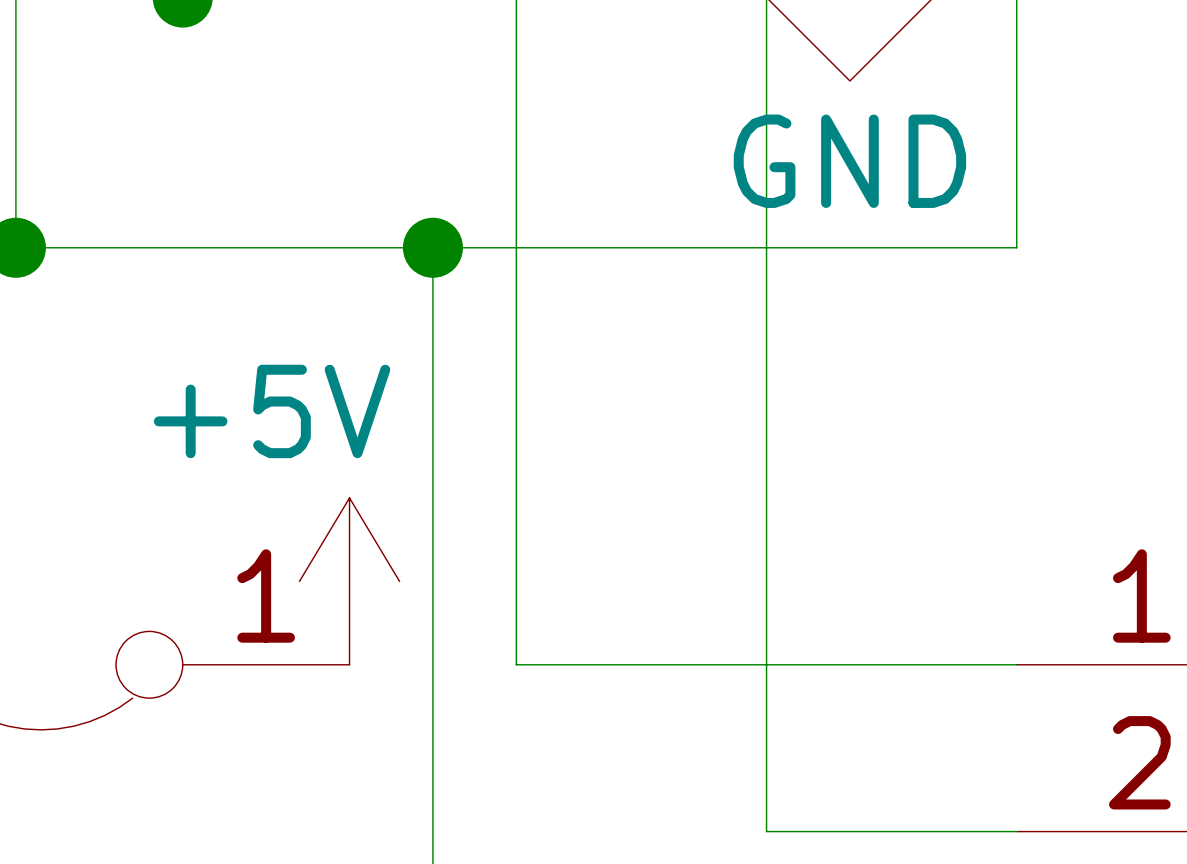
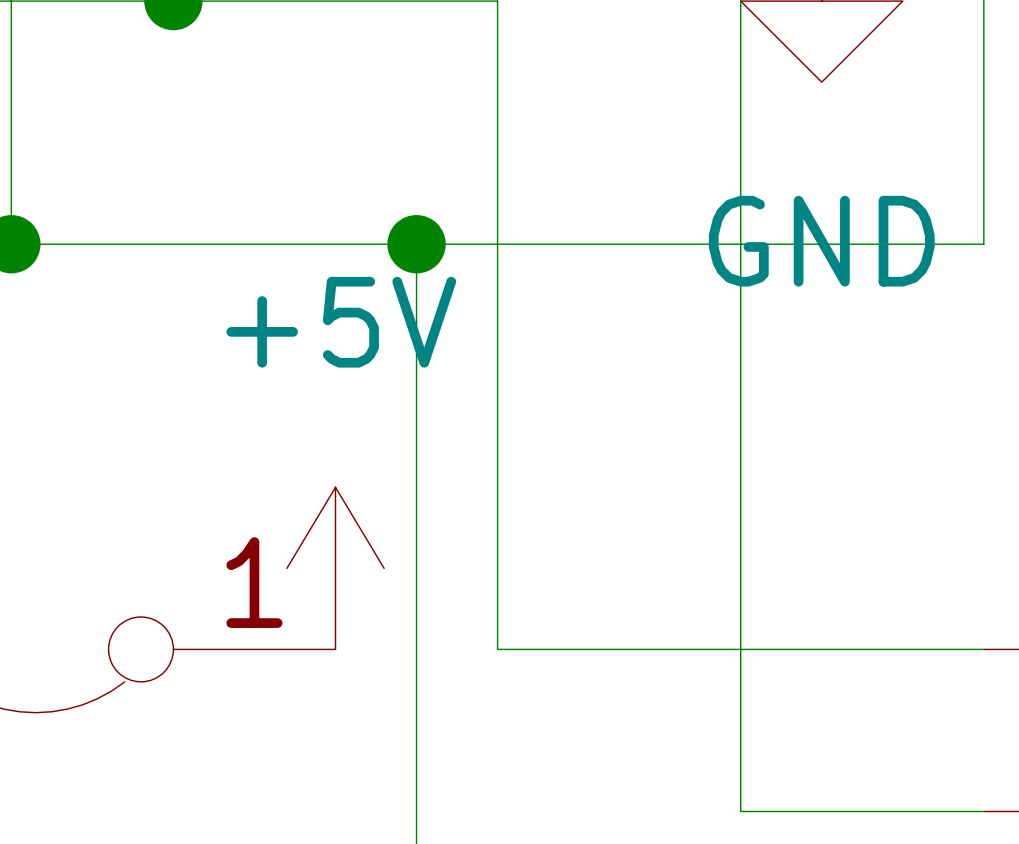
power symbol text position: GND (849, 161) -> GND (821, 241)
power symbol text position: +5V (272, 411) -> +5V (341, 322)

